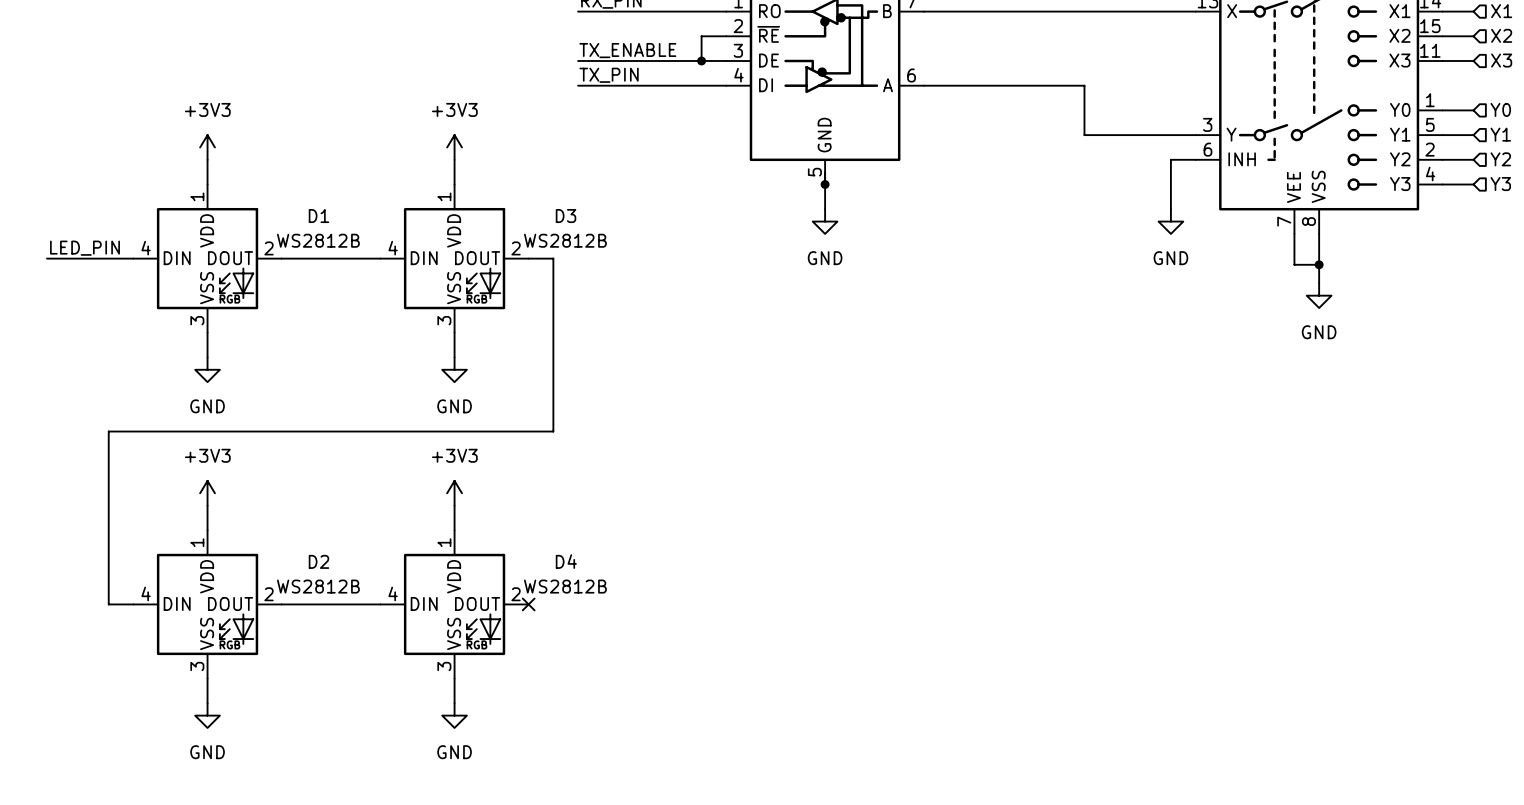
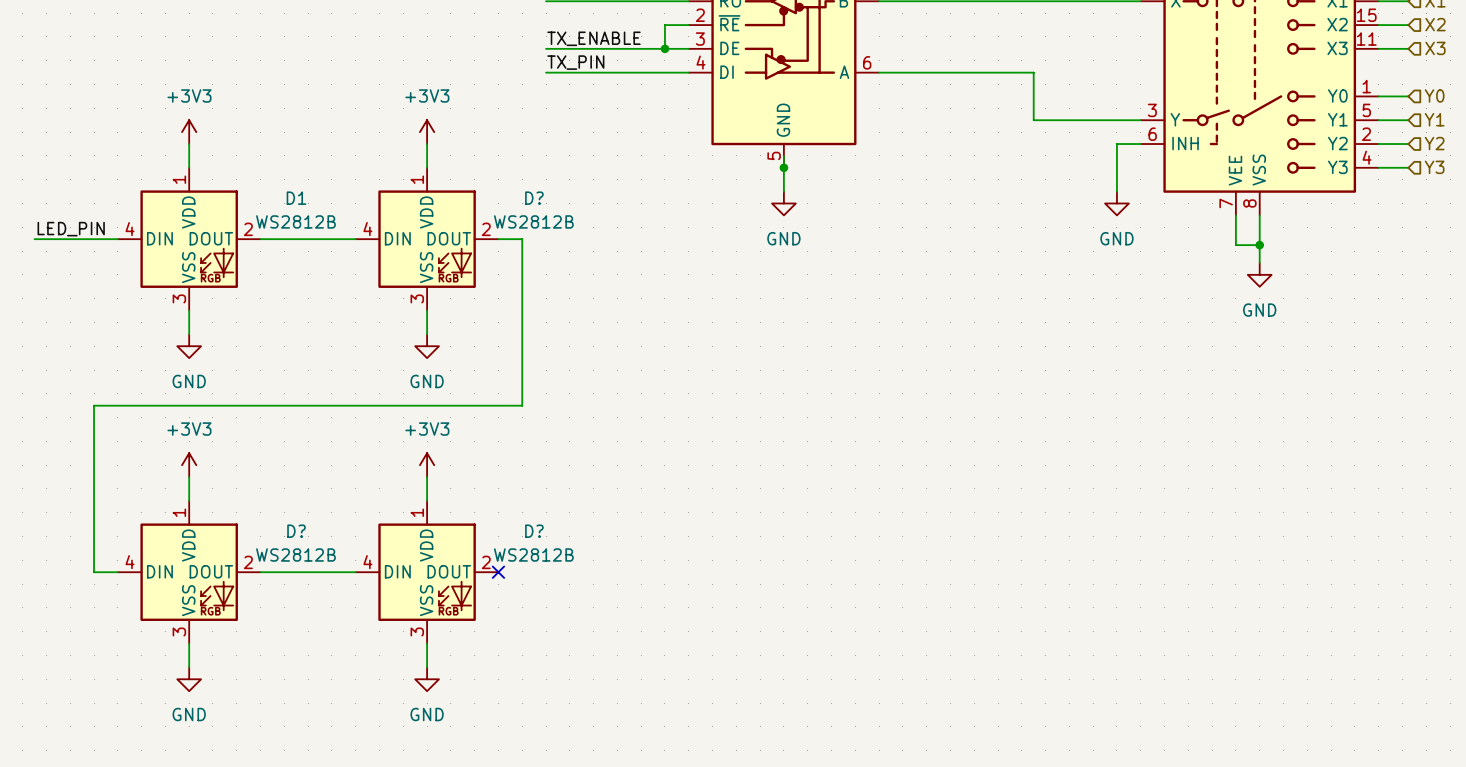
D3 name: D3 (566, 216) -> D? (534, 198)
D2 name: D2 (318, 561) -> D? (296, 531)
D4 name: D4 (566, 561) -> D? (534, 531)

